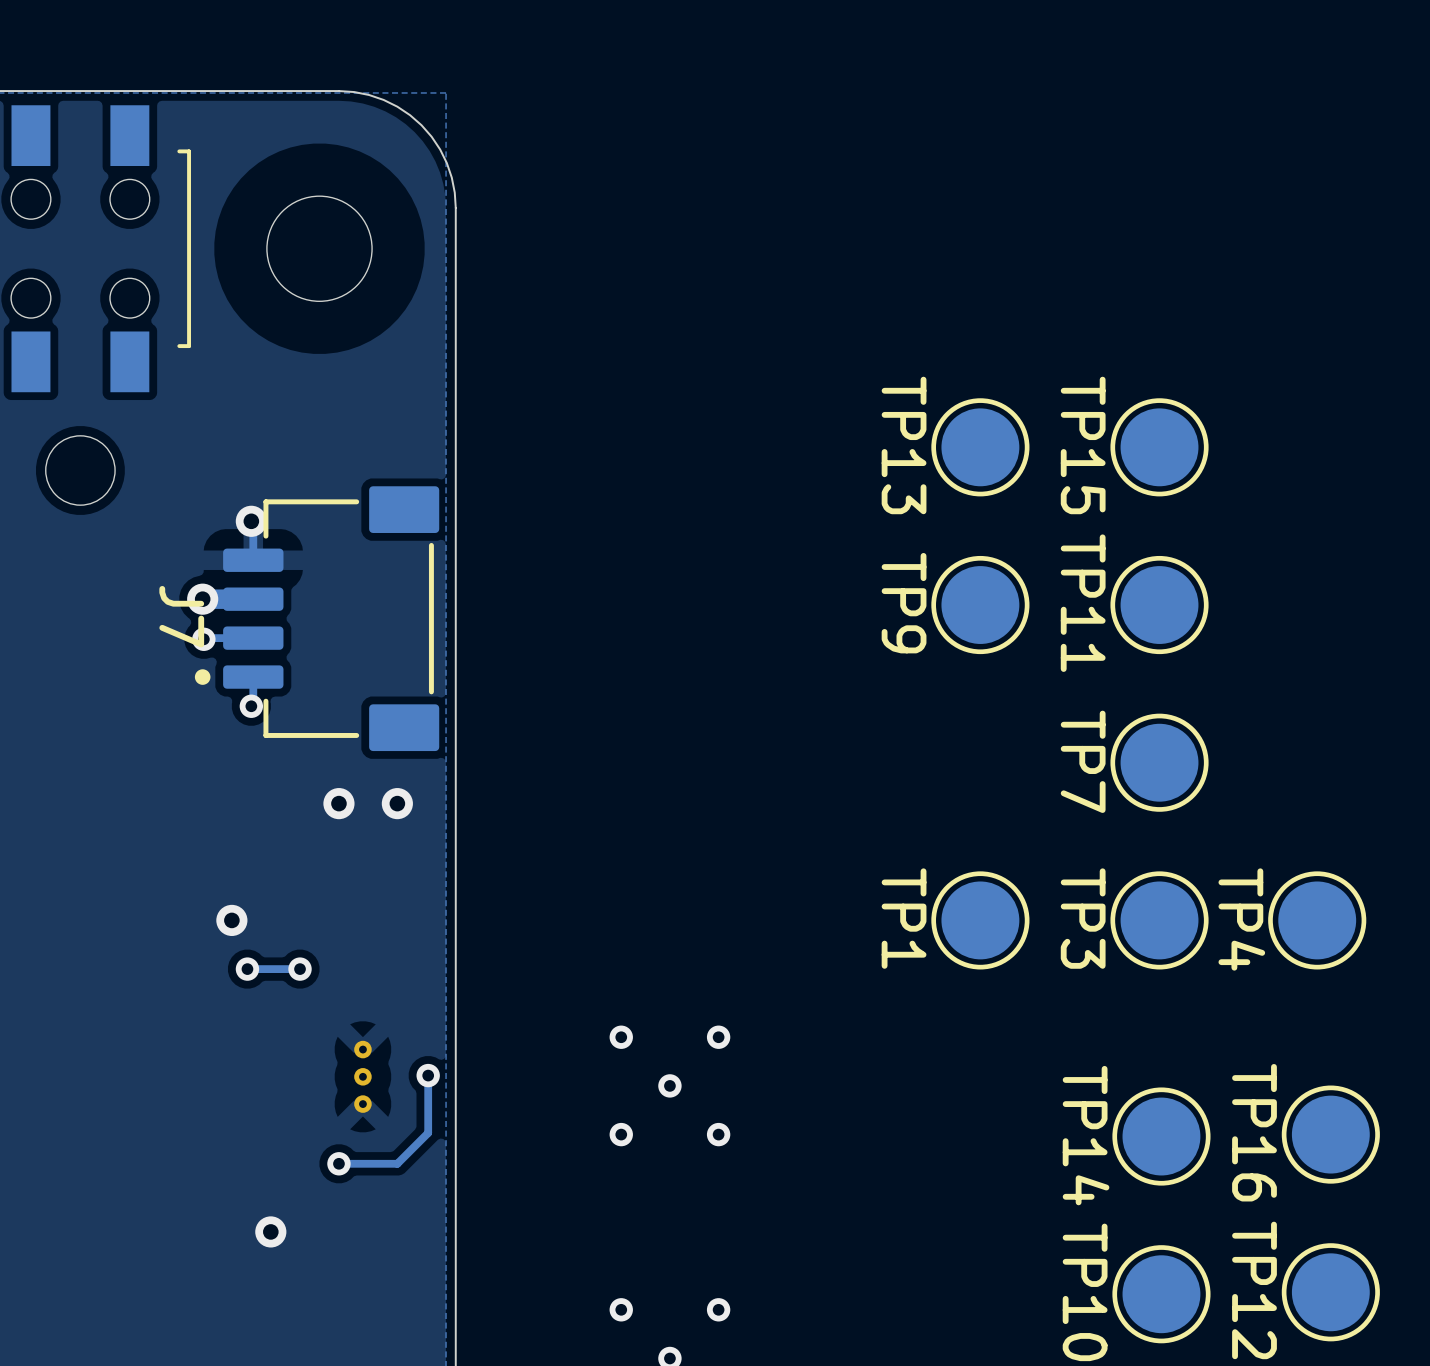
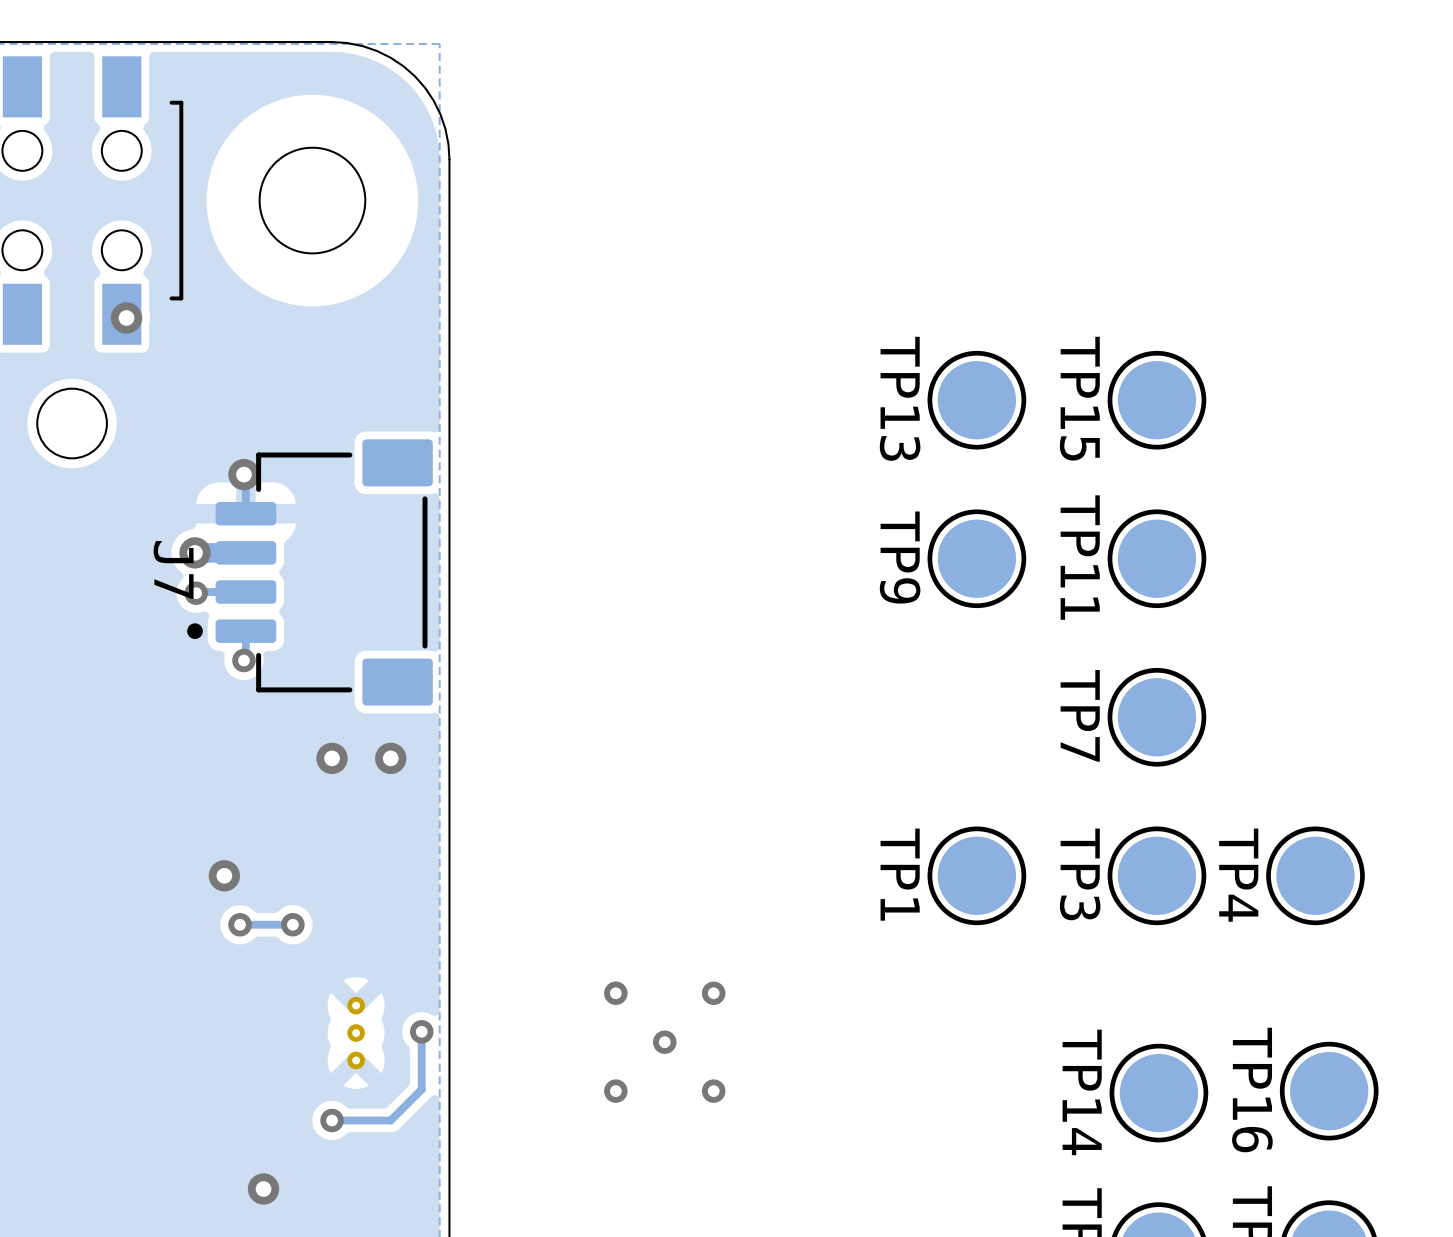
via: none -> (126, 318)

